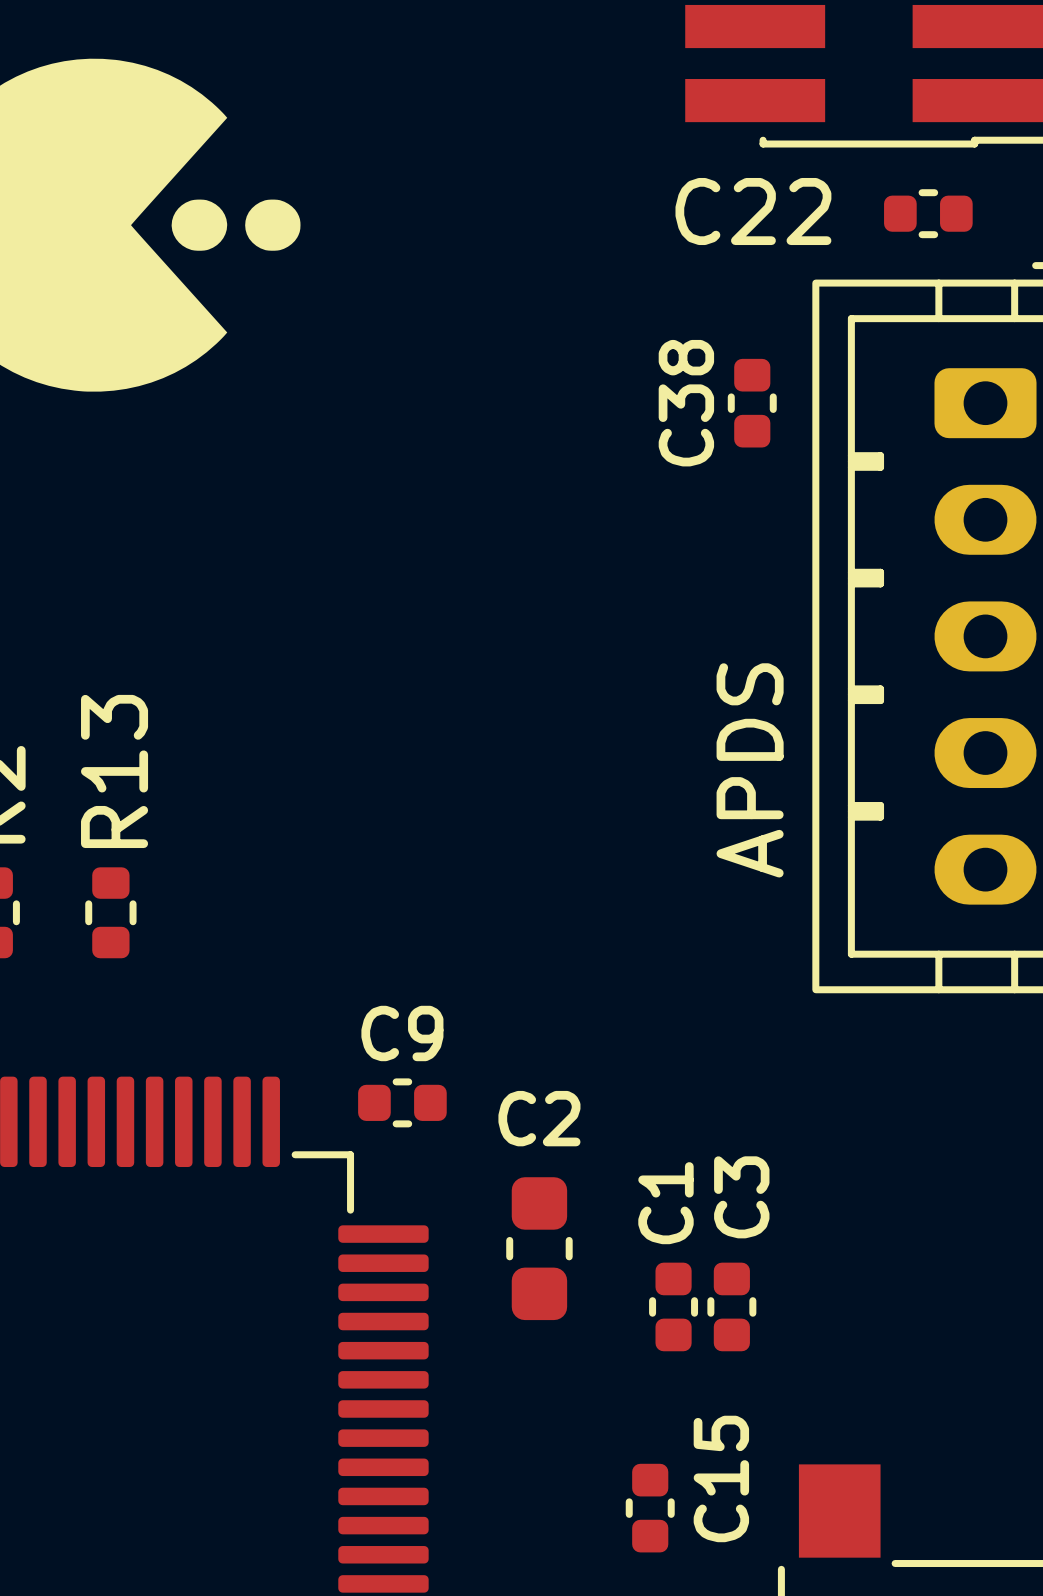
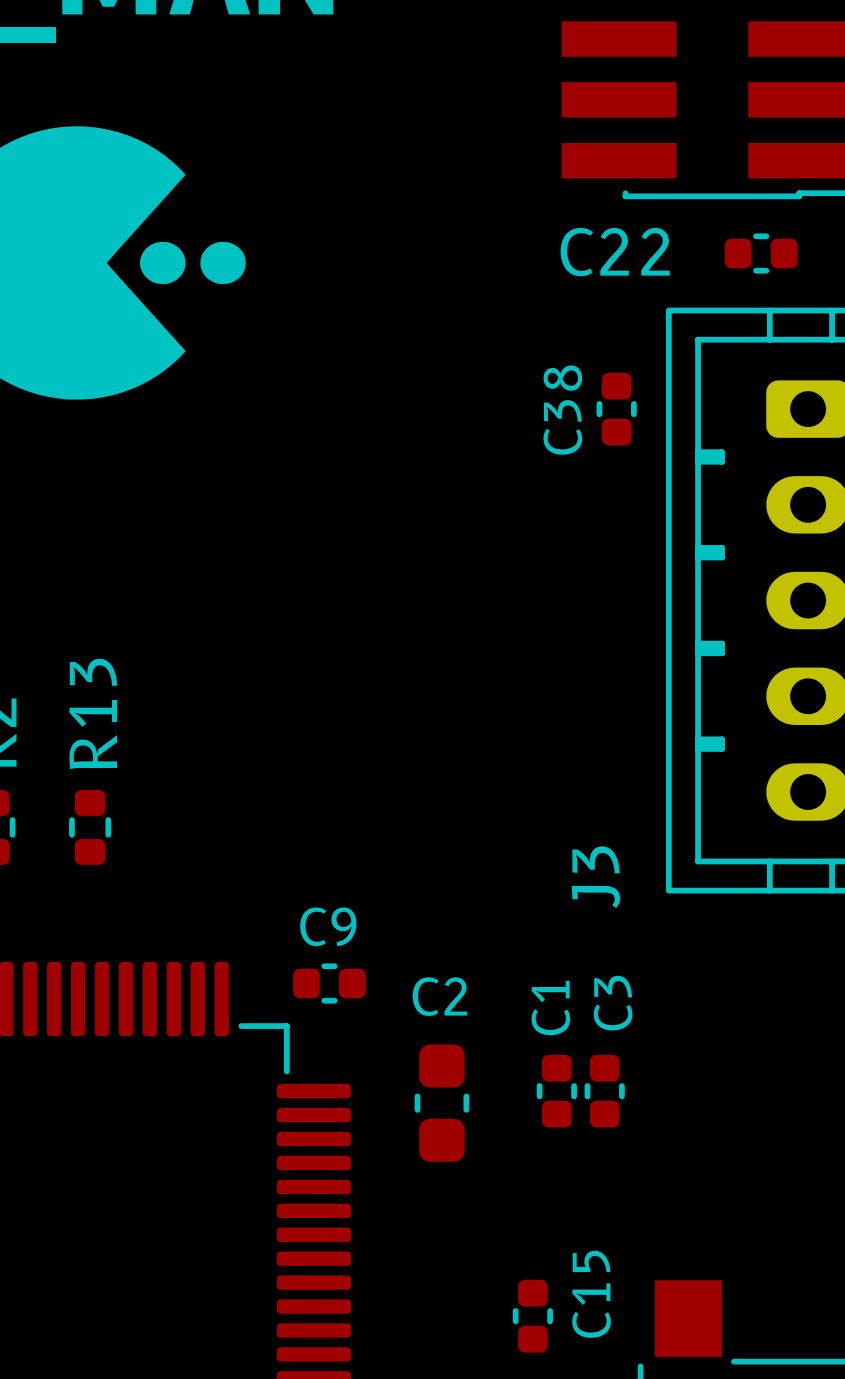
APDS name: APDS (750, 770) -> J3 (595, 877)
C1 position: (673, 1306) -> (556, 1091)
C3 position: (731, 1306) -> (604, 1091)

